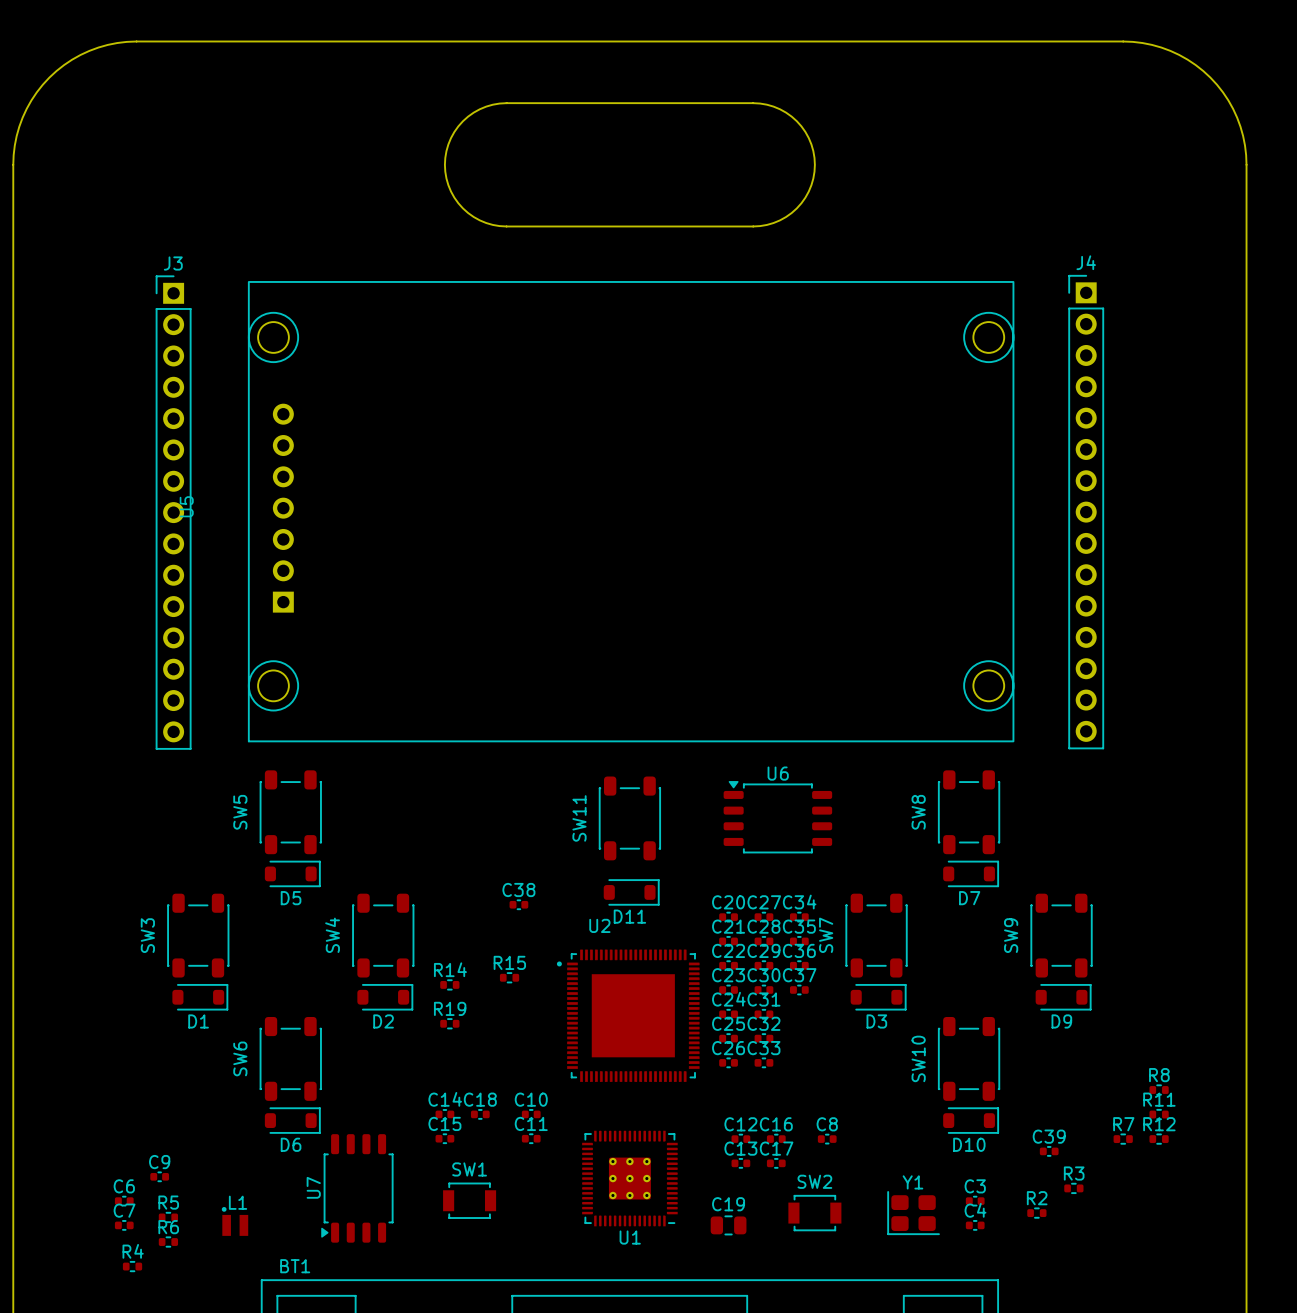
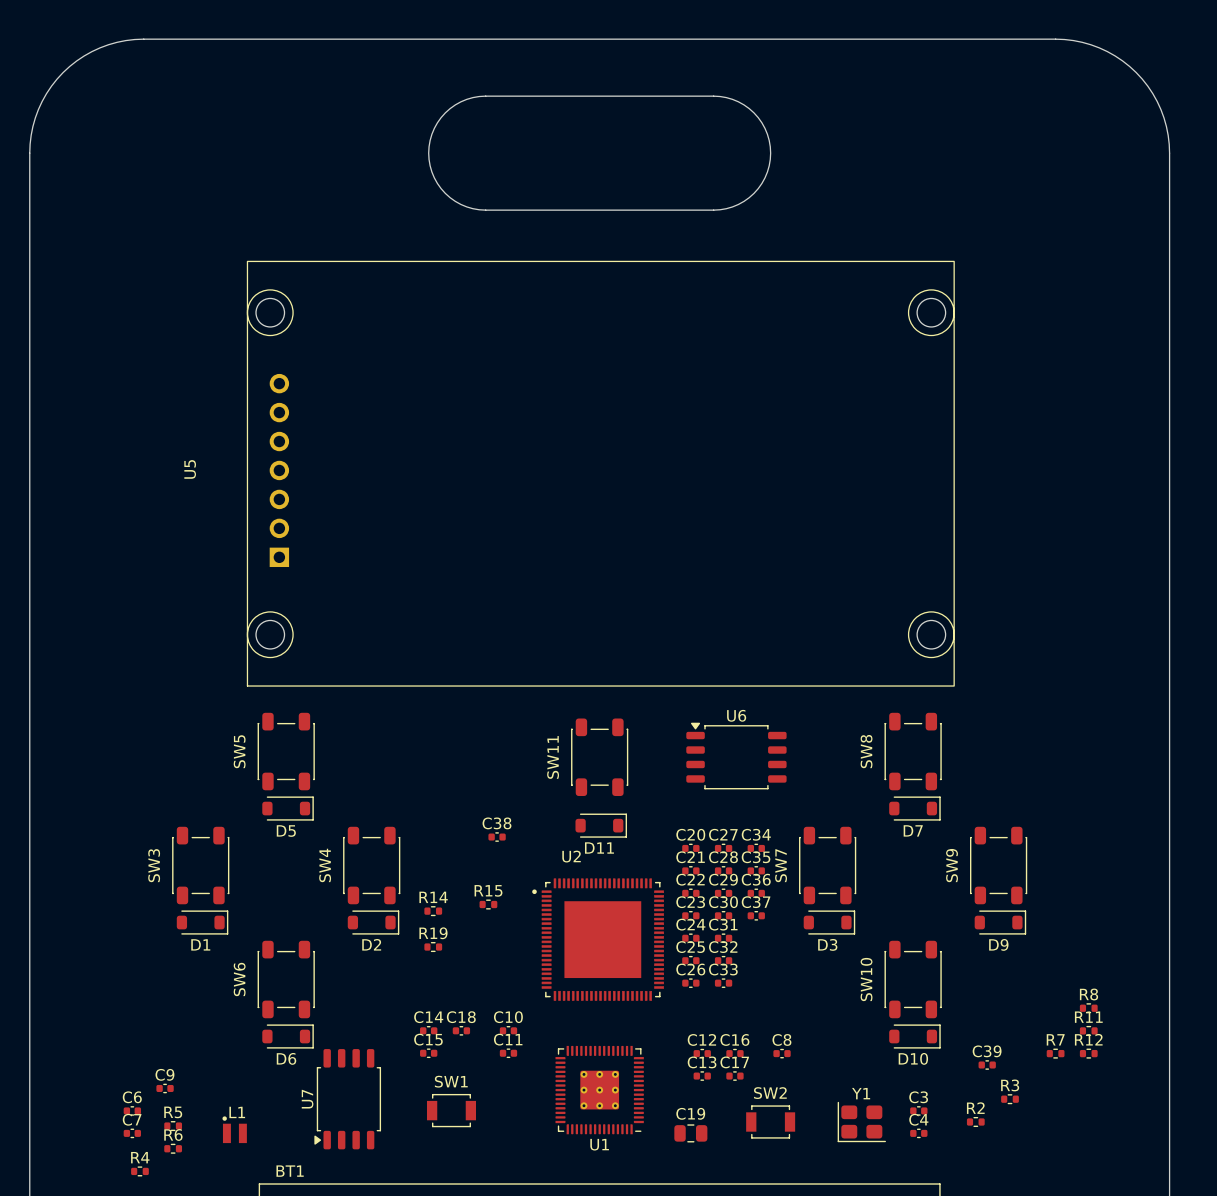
J3: (173, 512) -> none
J4: (1086, 512) -> none

